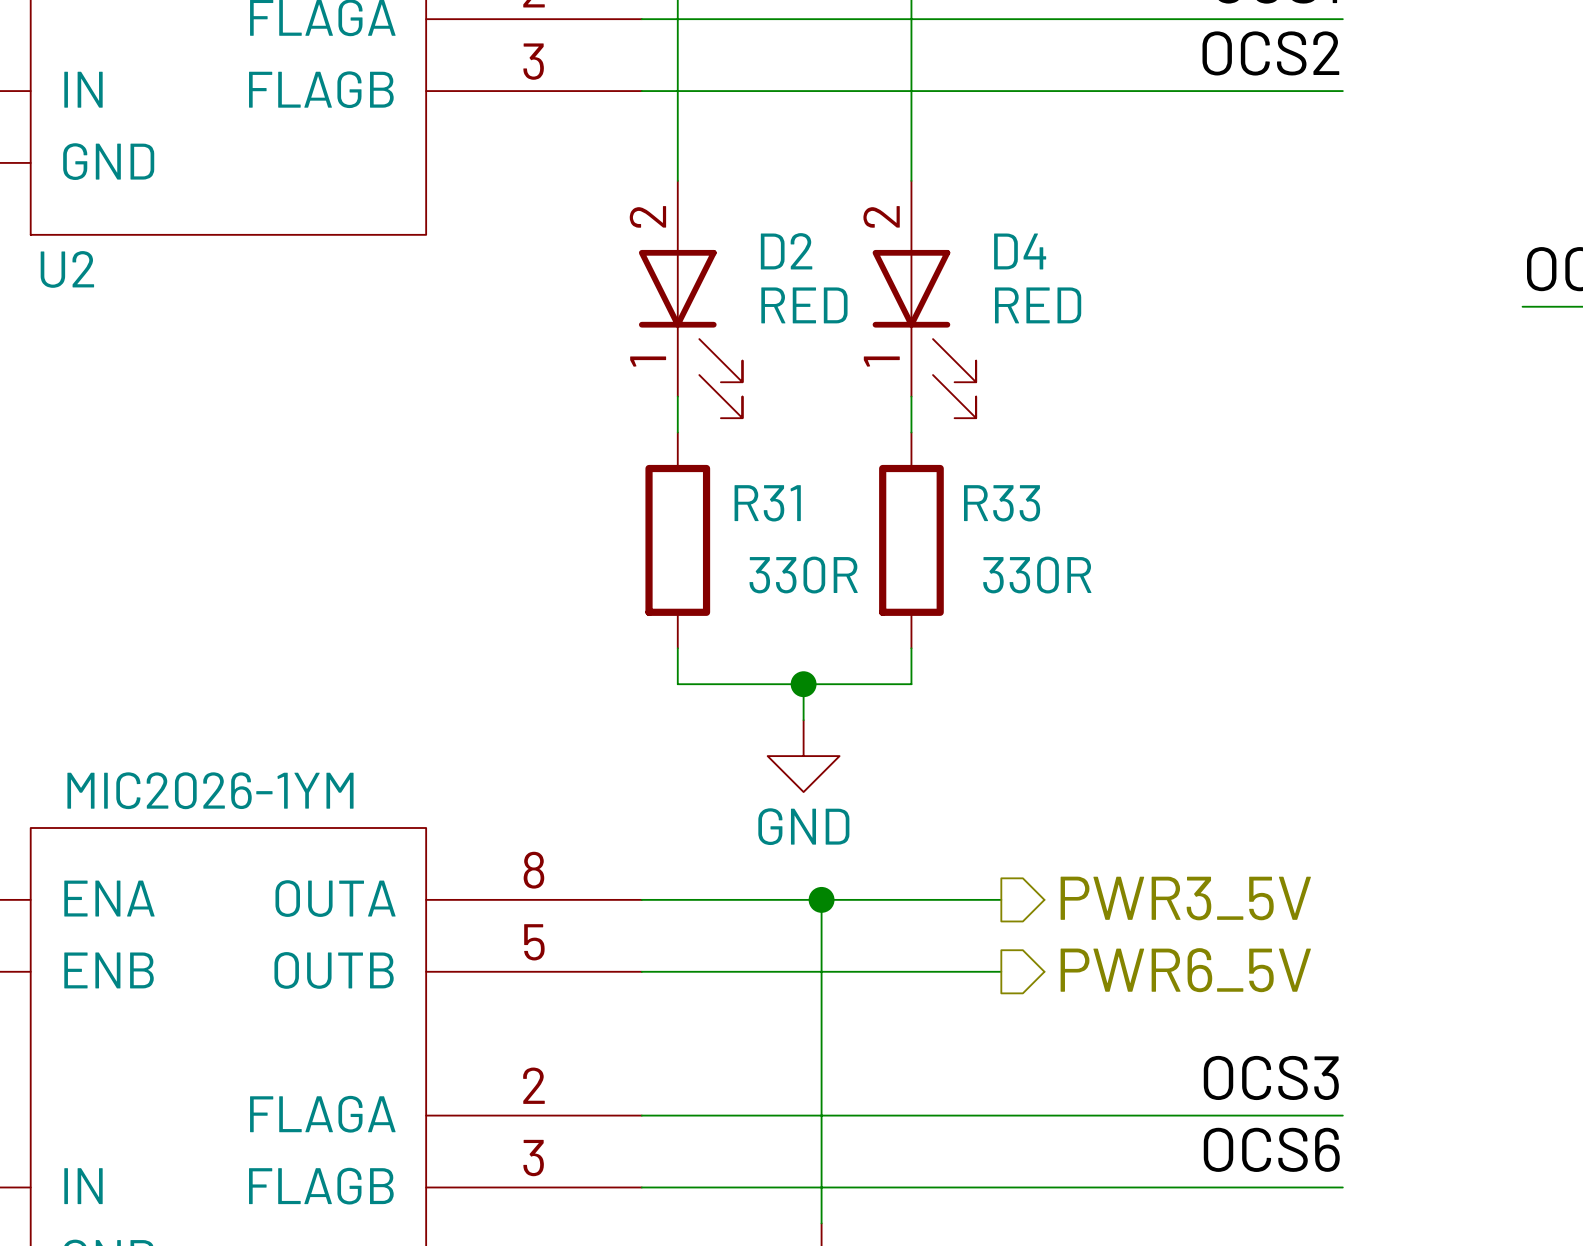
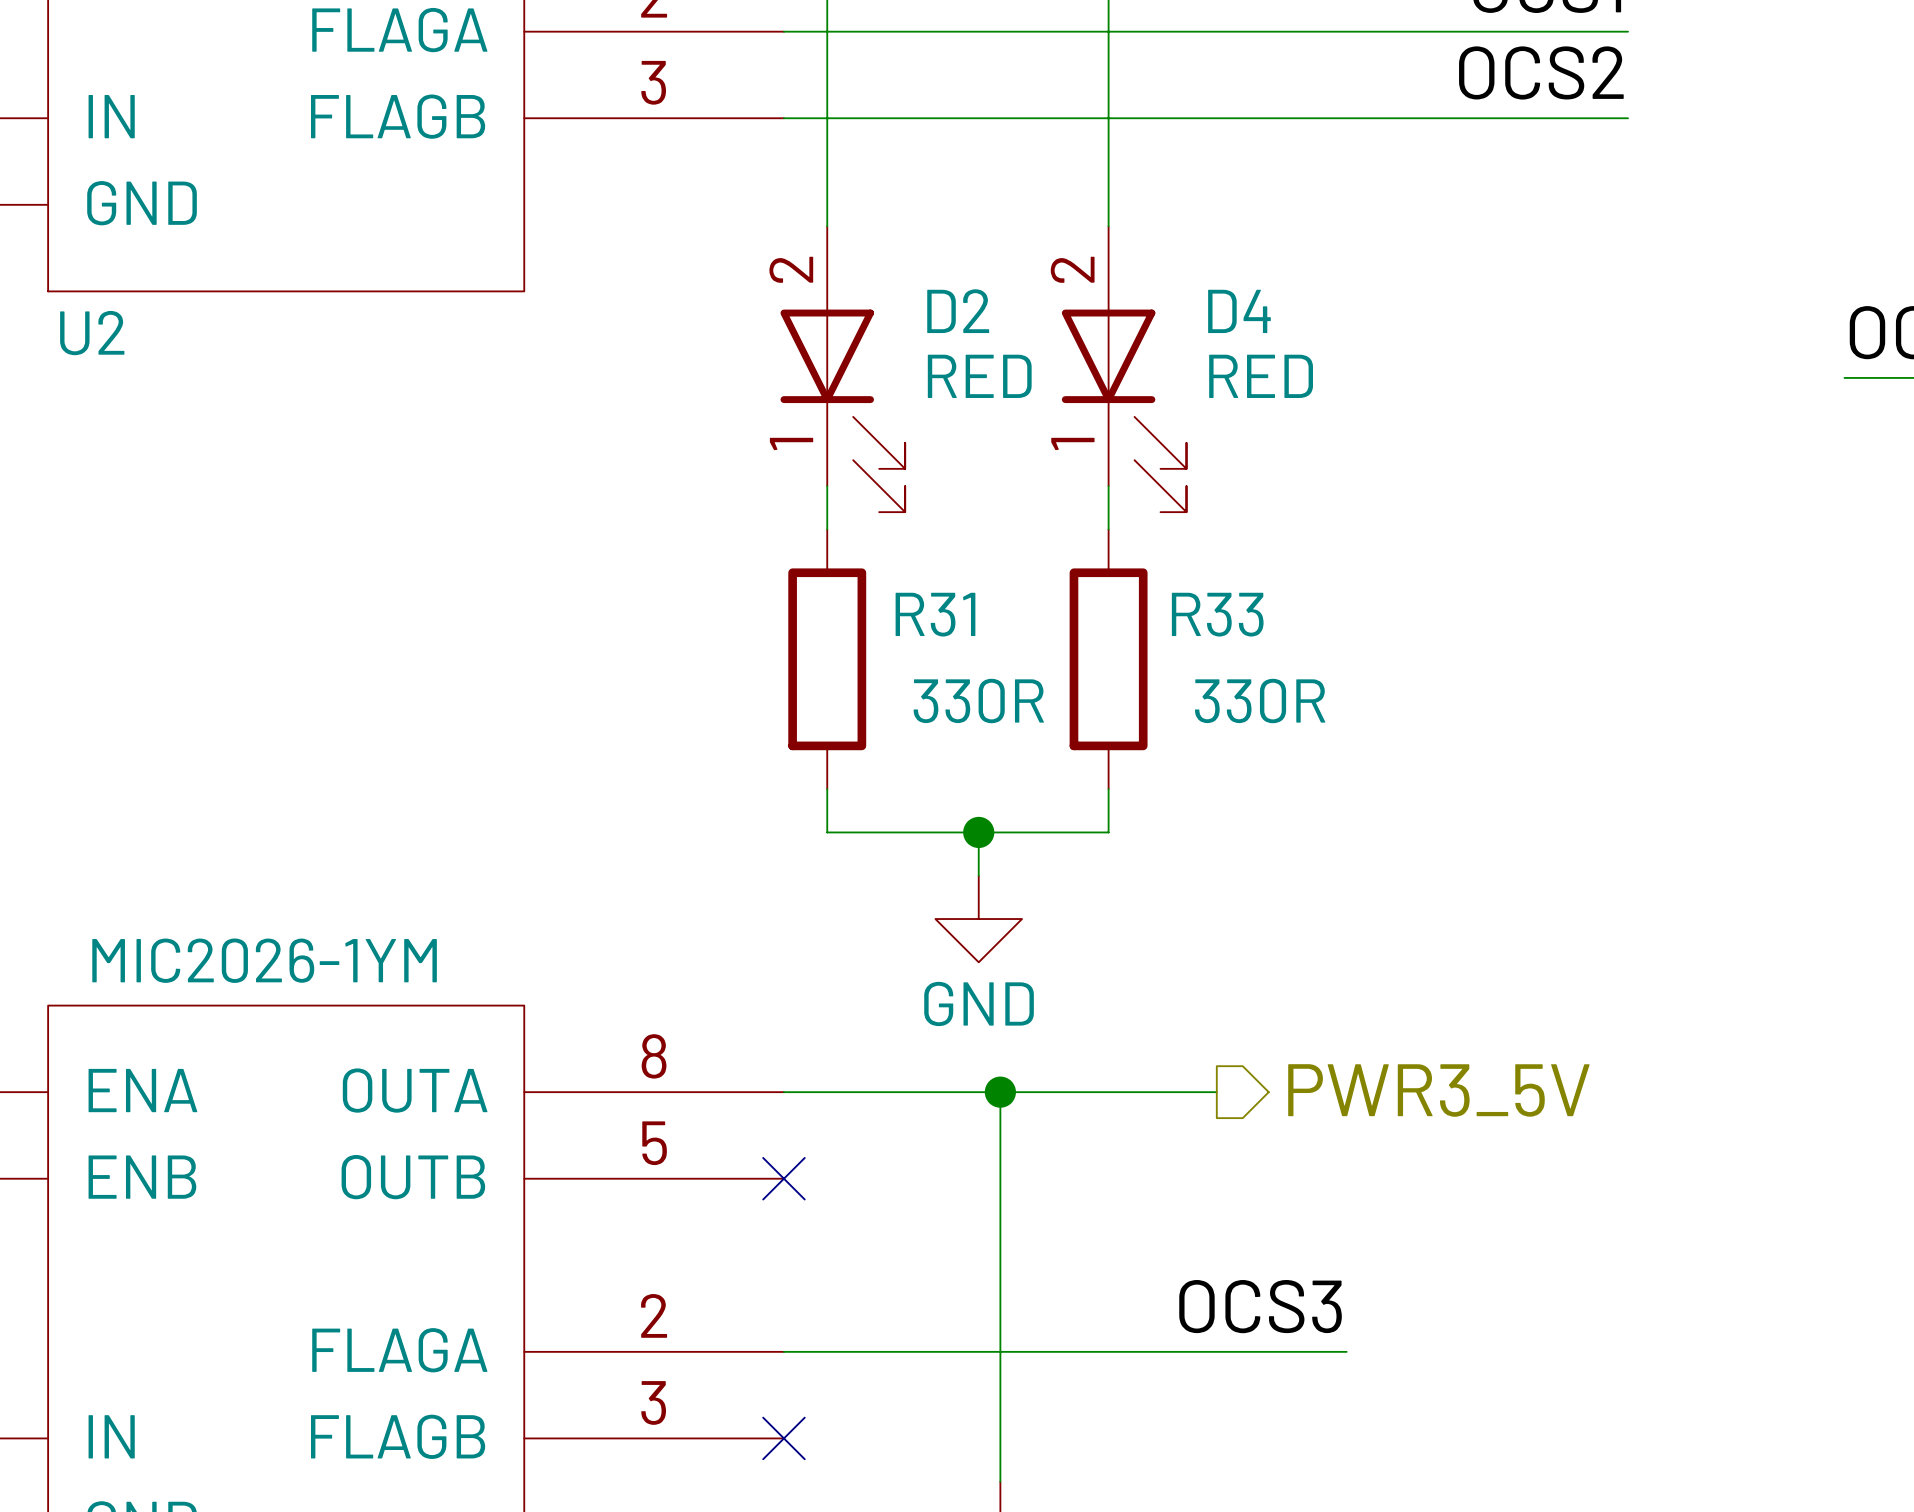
hierarchical label: PWR6_5V (1185, 970) -> none
wire: (641, 971) (1001, 971) -> none
no-connect mark: none -> (783, 1178)
label position: OCS3 (1271, 1077) -> OCS3 (1260, 1306)
wire: (1109, 1115) (1342, 1115) -> none
label: OCS6 (1271, 1149) -> none
wire: (641, 1187) (1342, 1187) -> none
no-connect mark: none -> (783, 1438)

